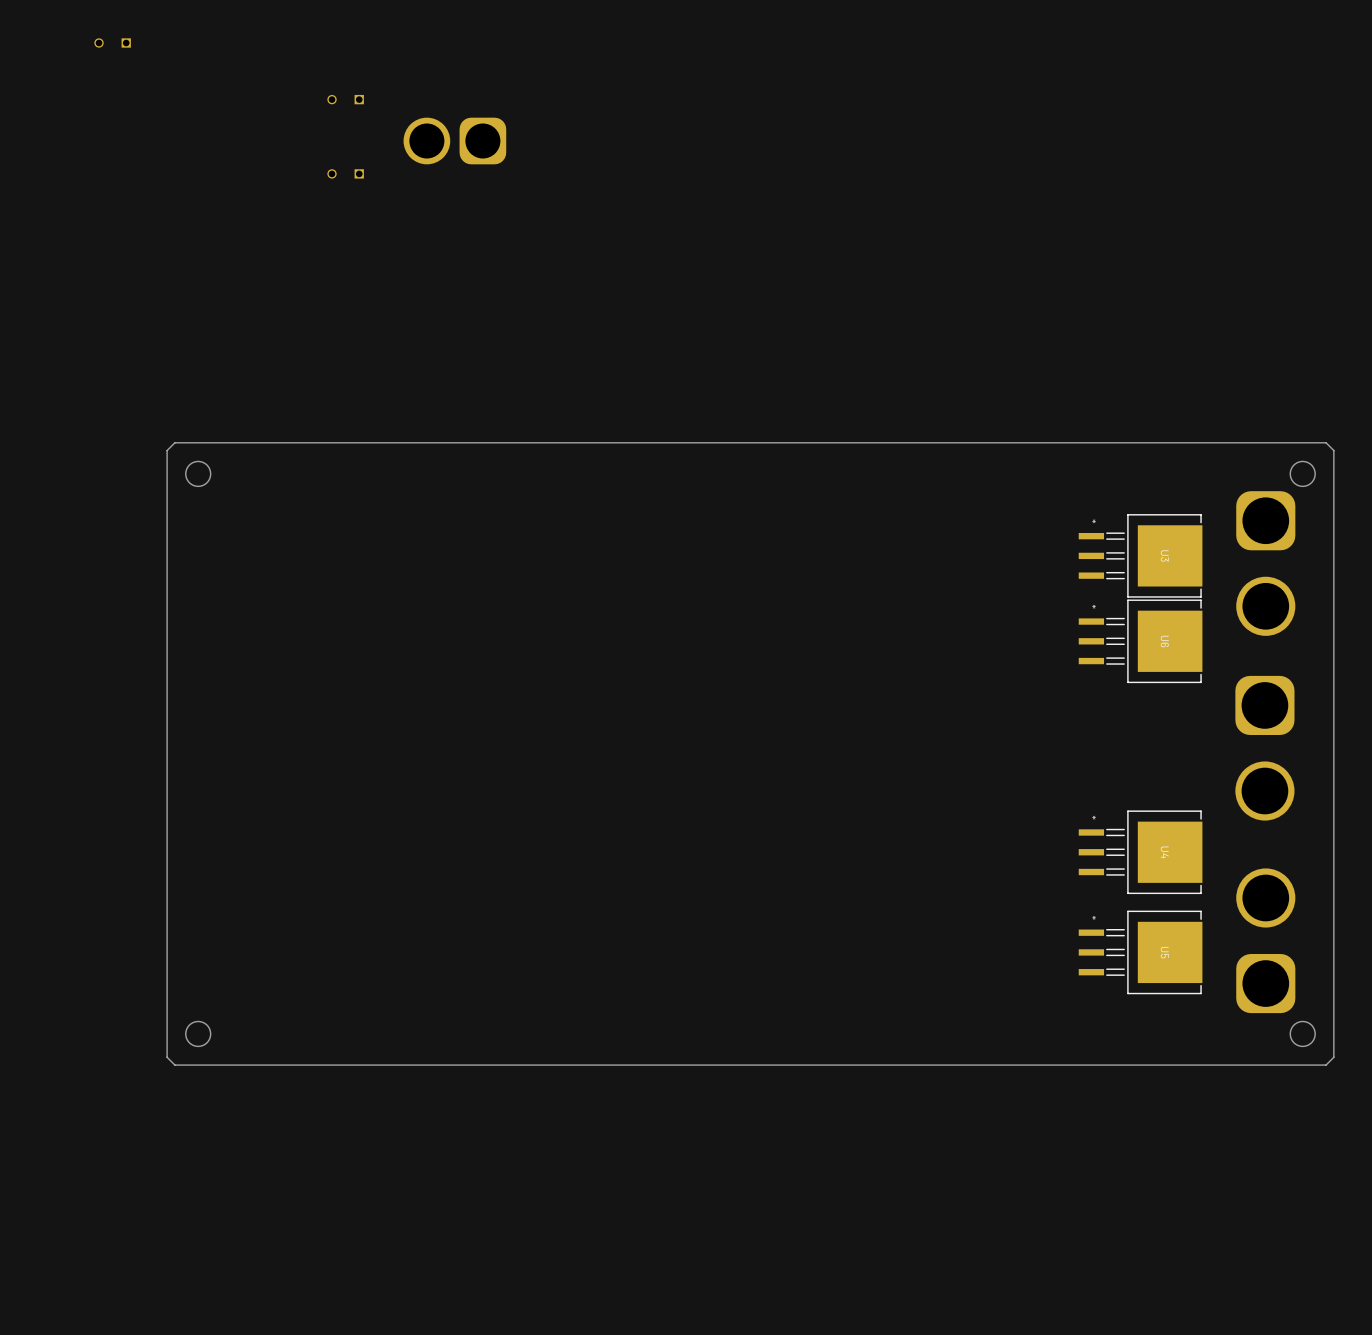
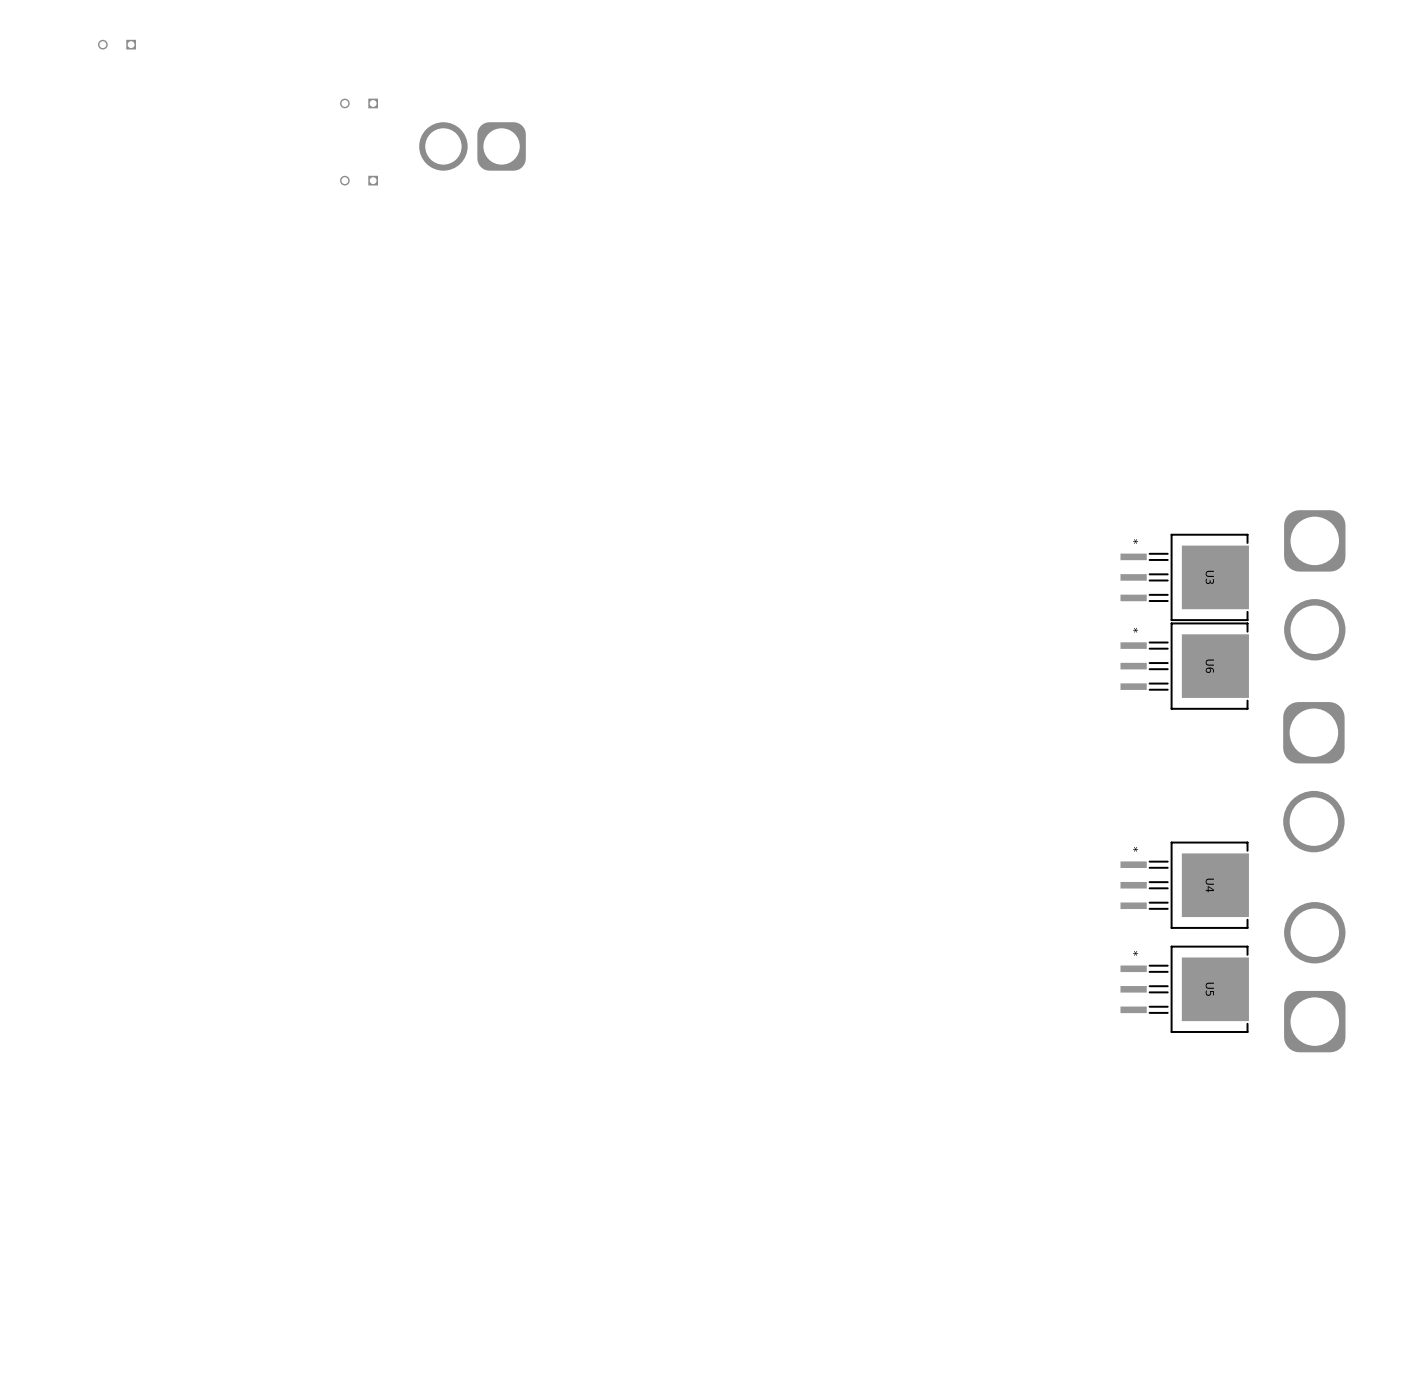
drawing: [166, 442, 1335, 1066] -> none

